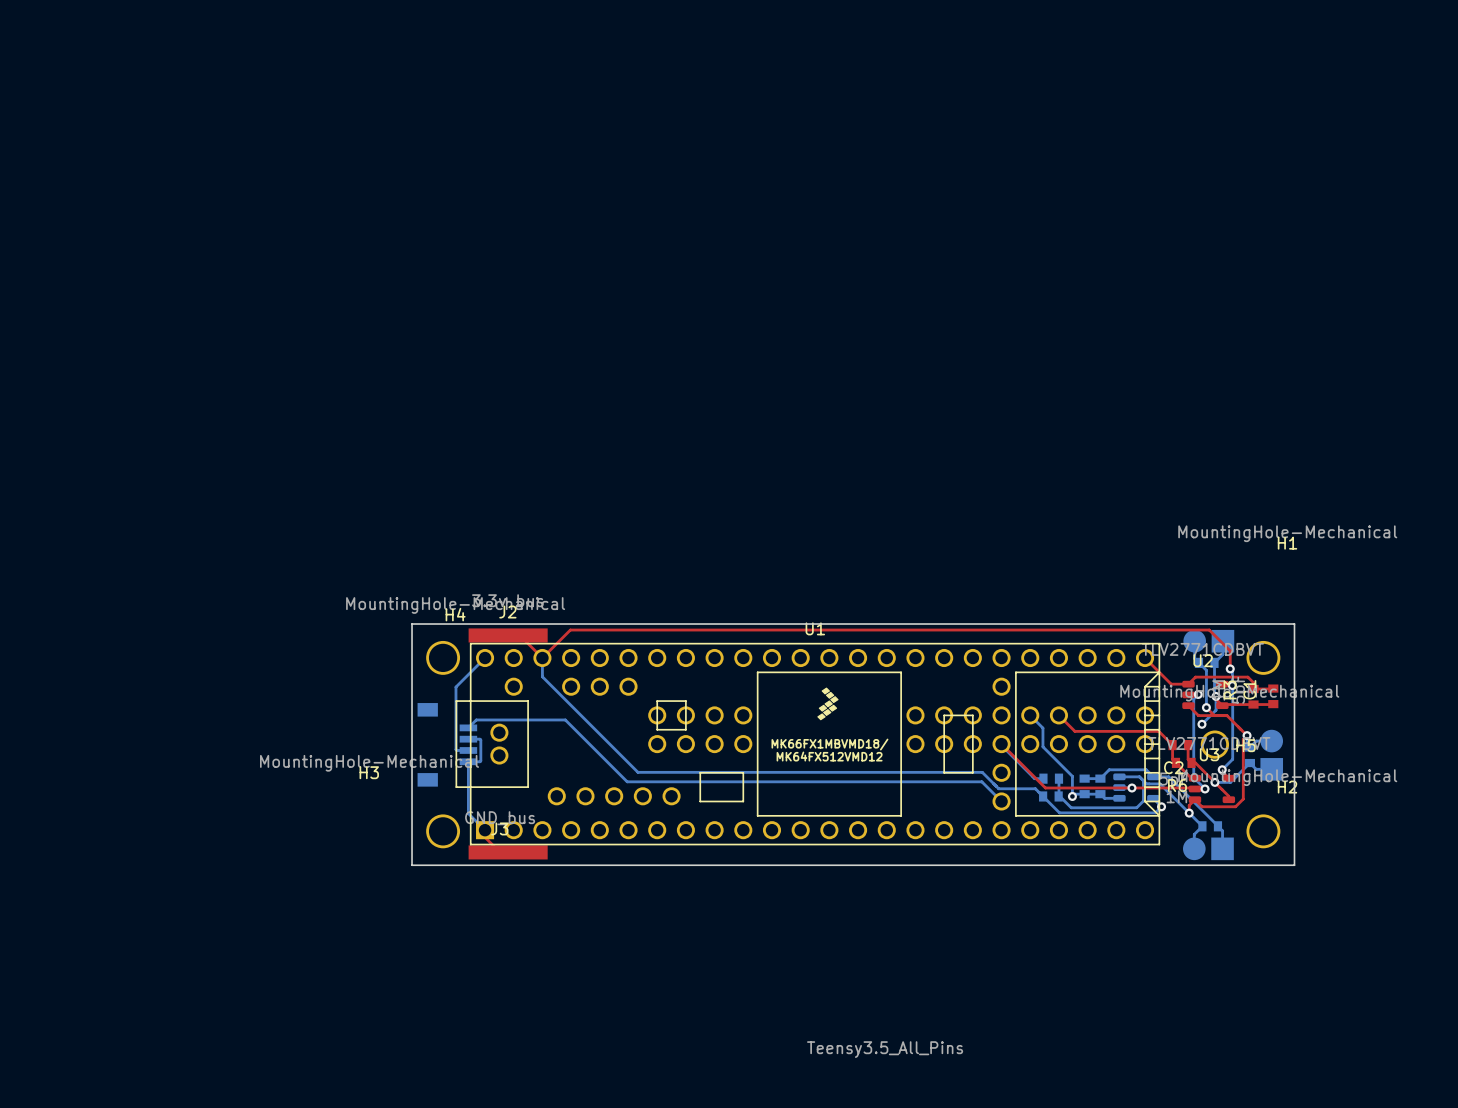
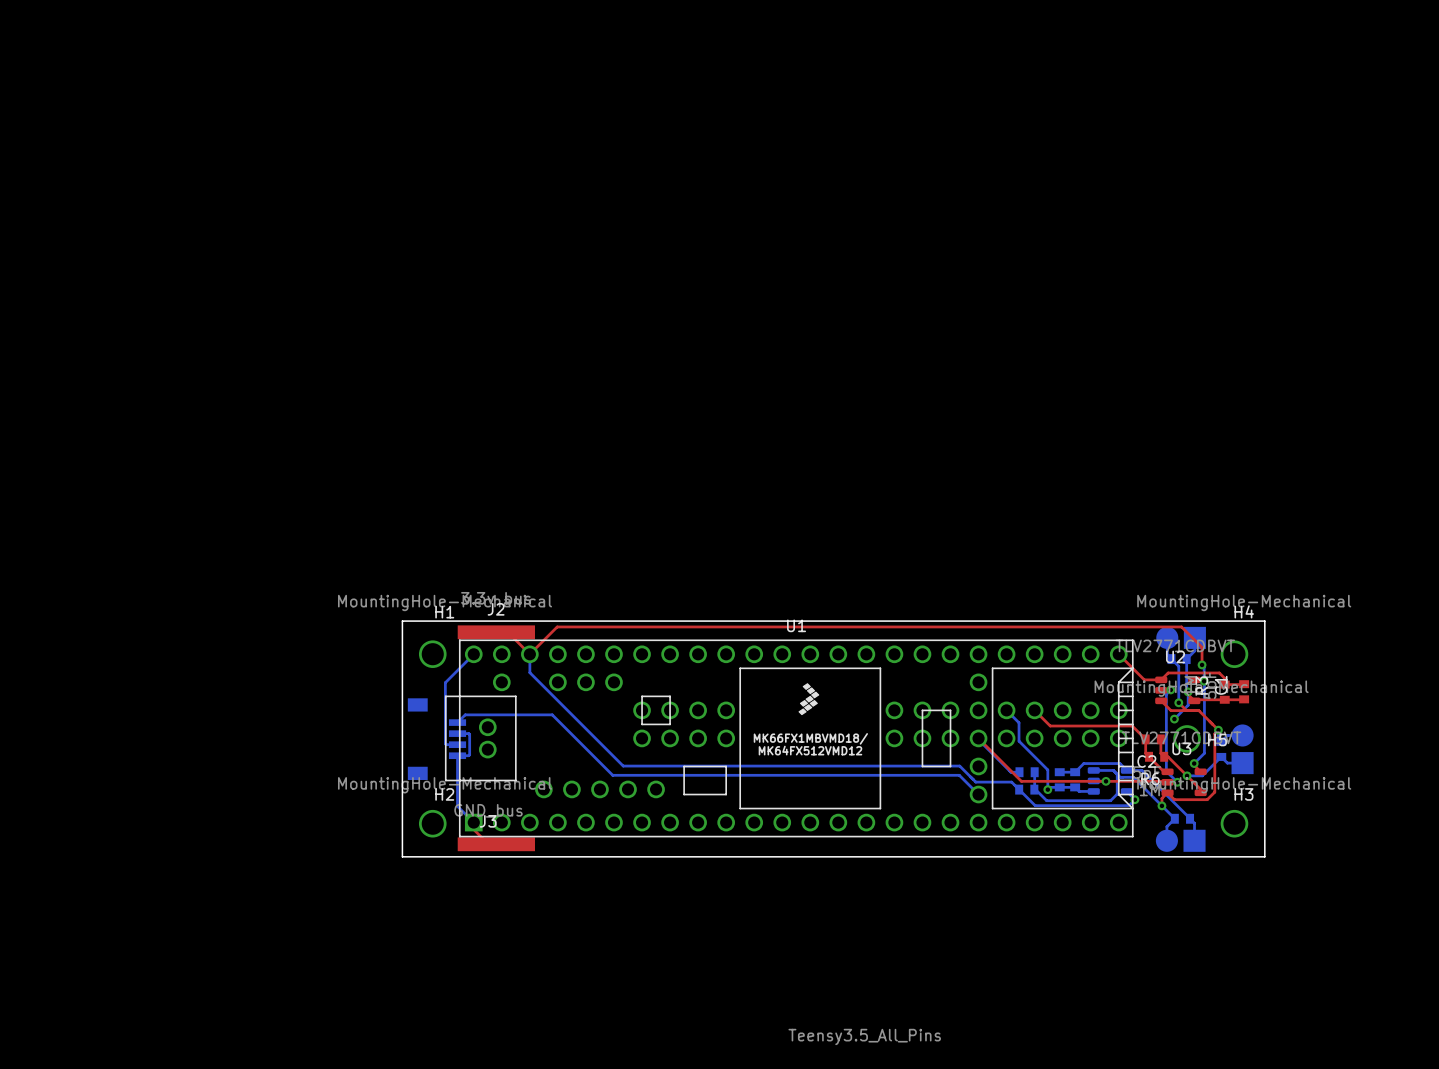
H1 value position: MountingHole-Mechanical (1287, 533) -> MountingHole-Mechanical (445, 602)
H1 name position: H1 (1287, 543) -> H1 (444, 612)
H4 footprint: [426, 640, 461, 675] -> [1220, 640, 1249, 668]
H1 footprint: [1246, 640, 1281, 675] -> [418, 640, 447, 668]
H3 value position: MountingHole-Mechanical (369, 763) -> MountingHole-Mechanical (1244, 785)
H3 name position: H3 (369, 772) -> H3 (1243, 794)
H3 footprint: [426, 814, 461, 849] -> [1220, 809, 1249, 838]
H2 footprint: [1246, 814, 1281, 849] -> [418, 809, 447, 838]

